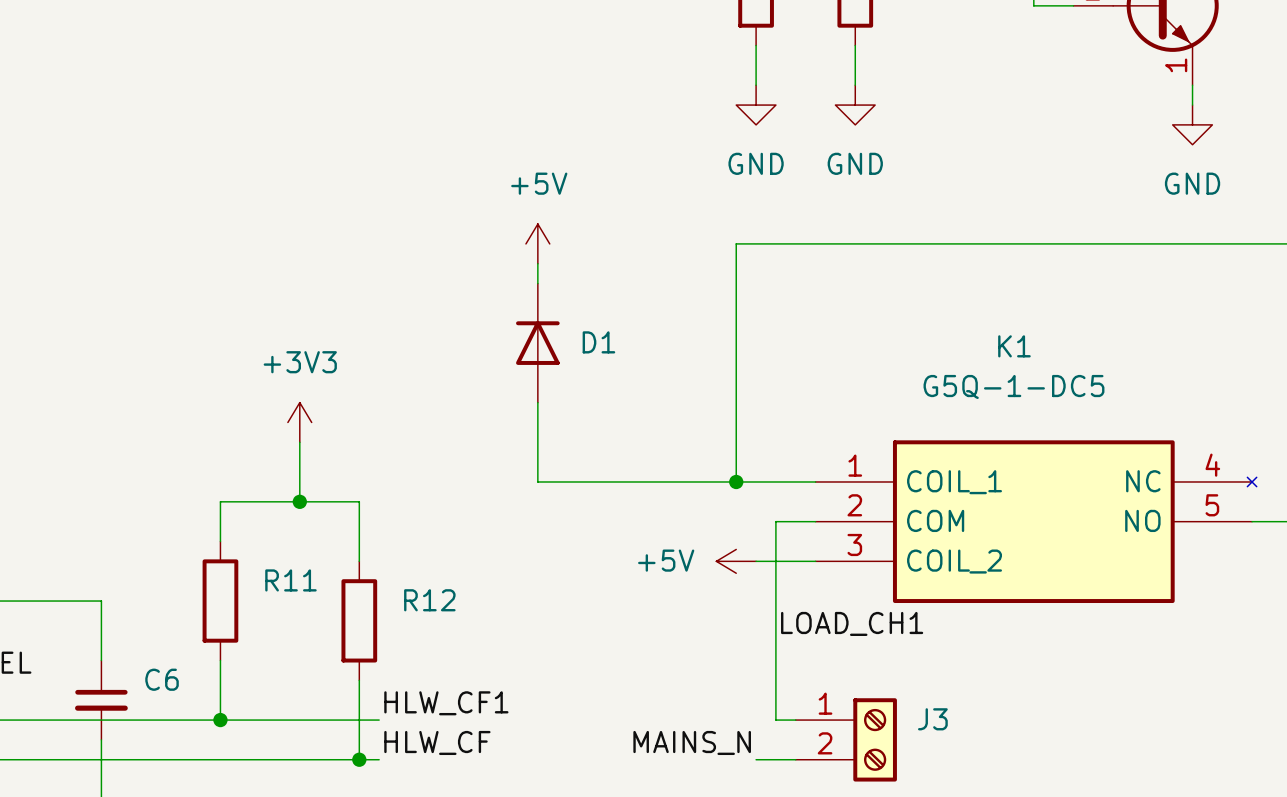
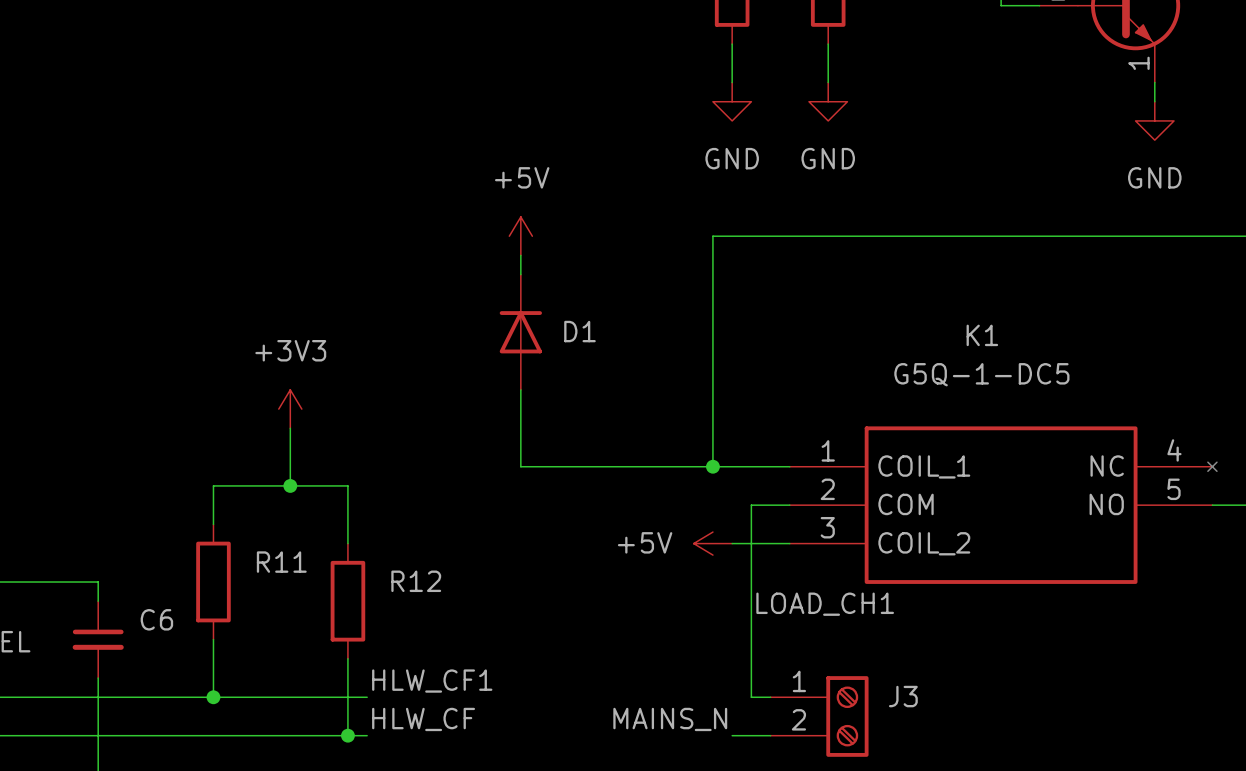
C6 position: (101, 700) -> (98, 639)

